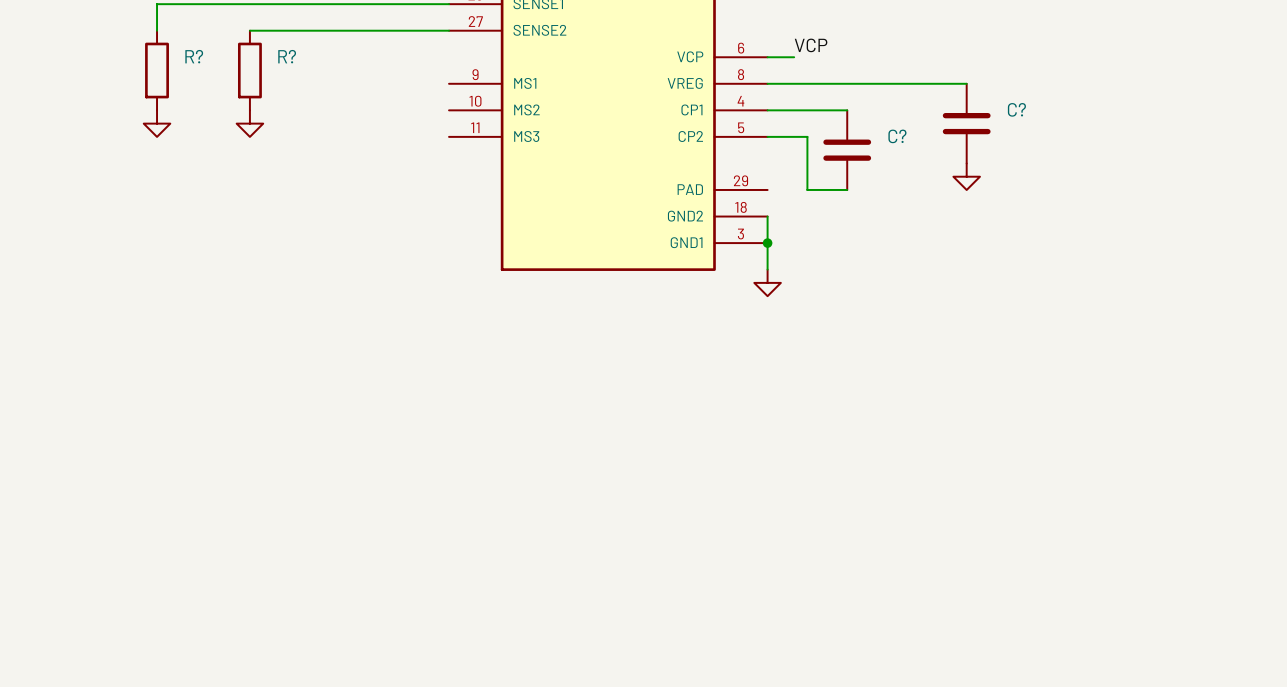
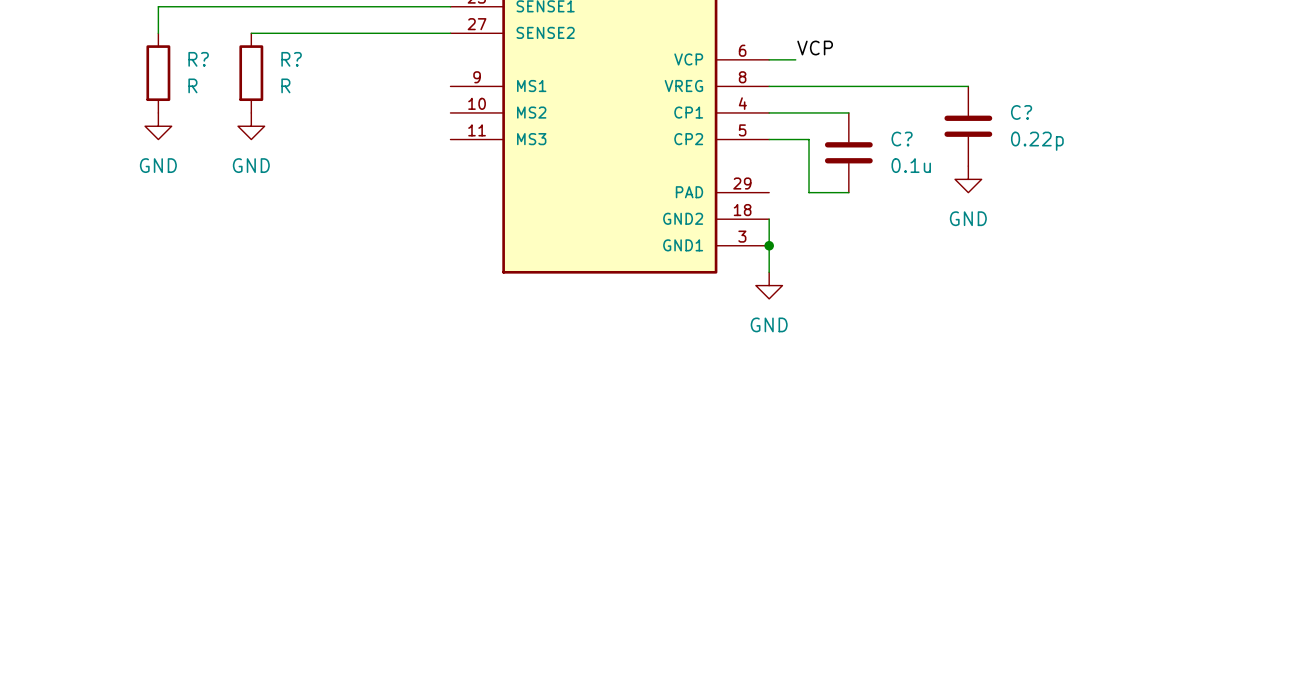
R? value: none -> R (192, 85)
R? value: none -> R (285, 85)
C? value: none -> 0.22p (1037, 141)
power symbol text: none -> GND (158, 165)
power symbol text: none -> GND (251, 165)
C? value: none -> 0.1u (911, 165)
power symbol text: none -> GND (968, 218)
power symbol text: none -> GND (769, 324)

